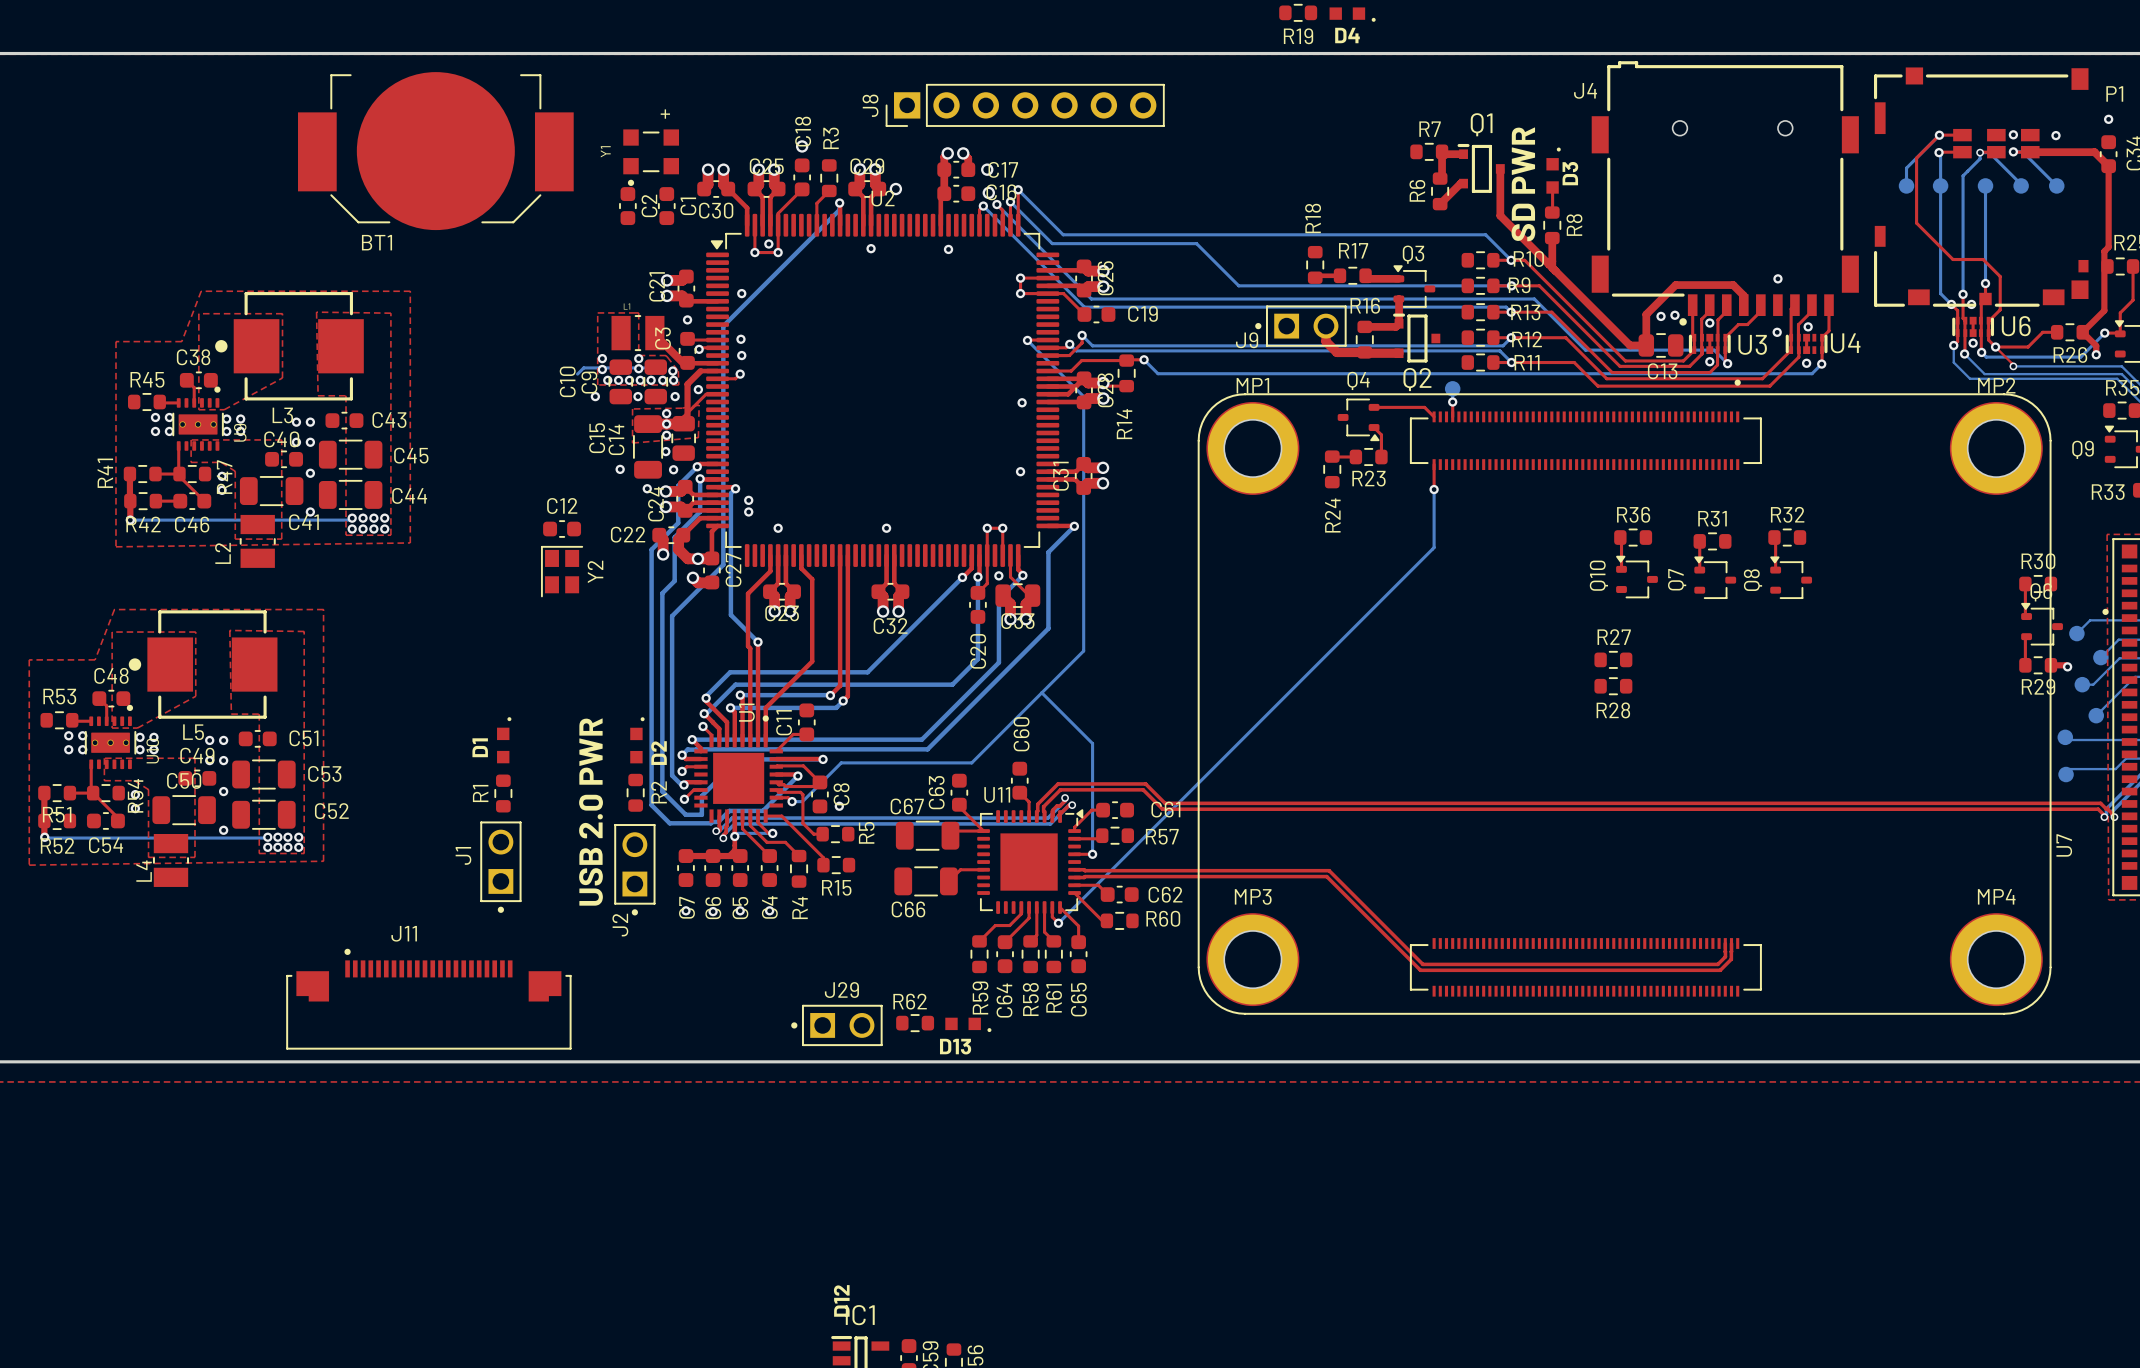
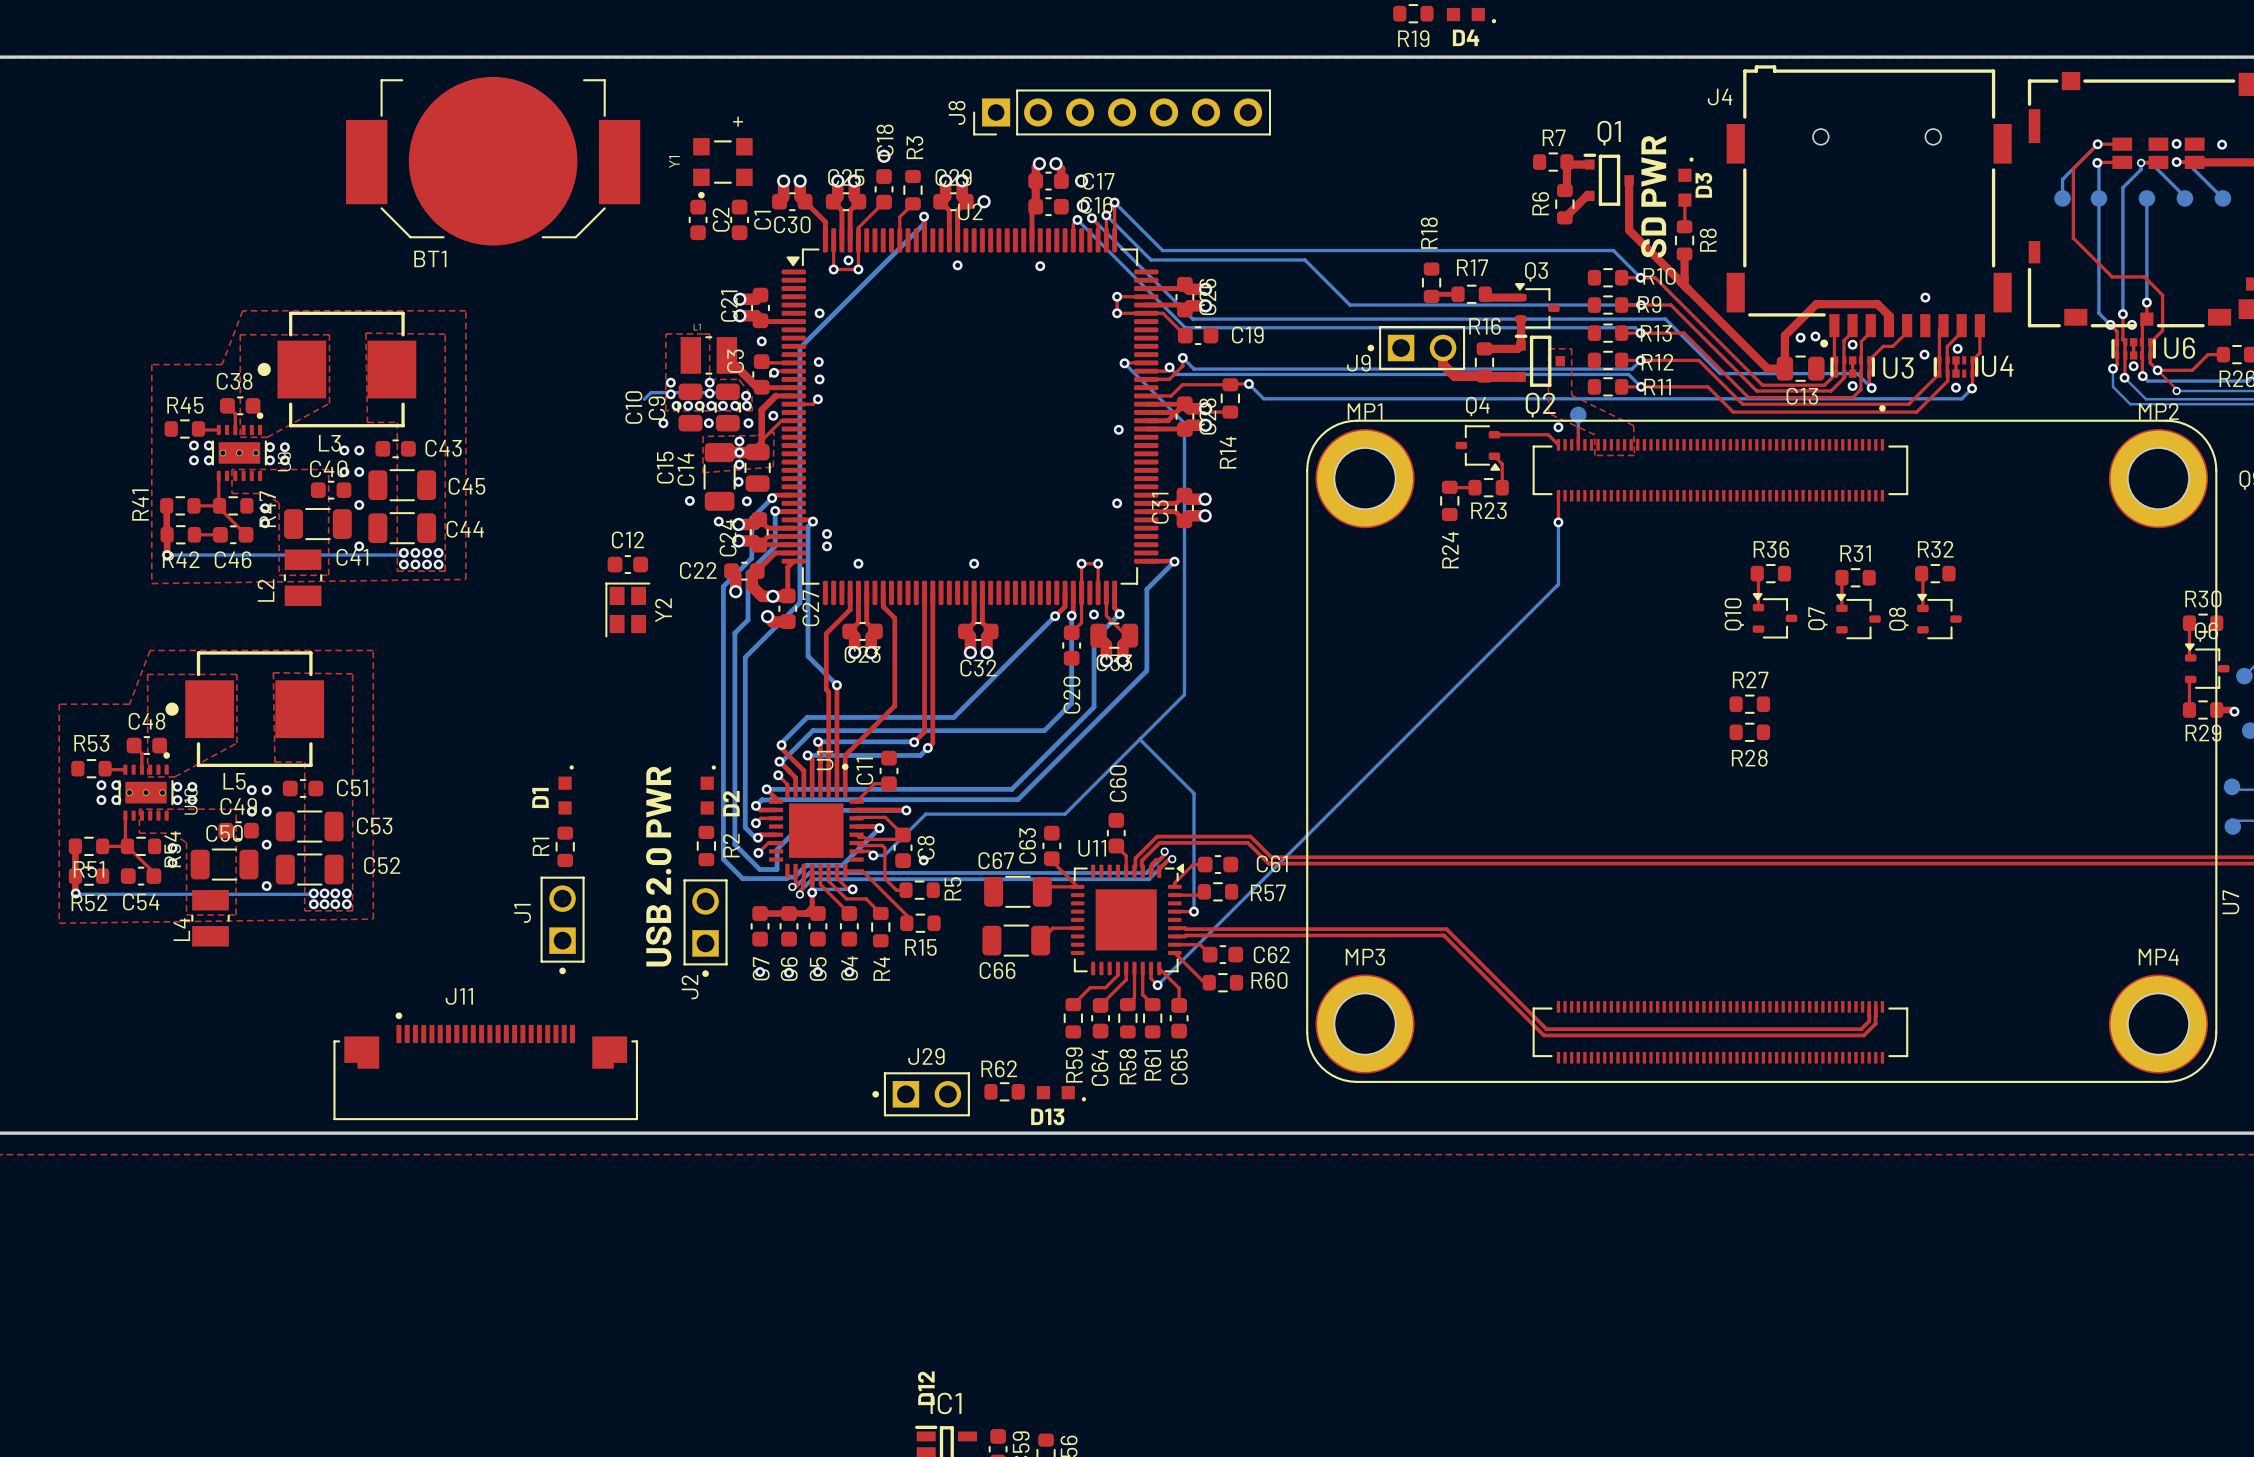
top zone outline: none -> (1548, 348) (1571, 348) (1571, 395) (1633, 425) (1634, 455) (1594, 455) (1594, 434) (1548, 413) (1548, 348)
via position: (1452, 402) -> (1558, 427)

